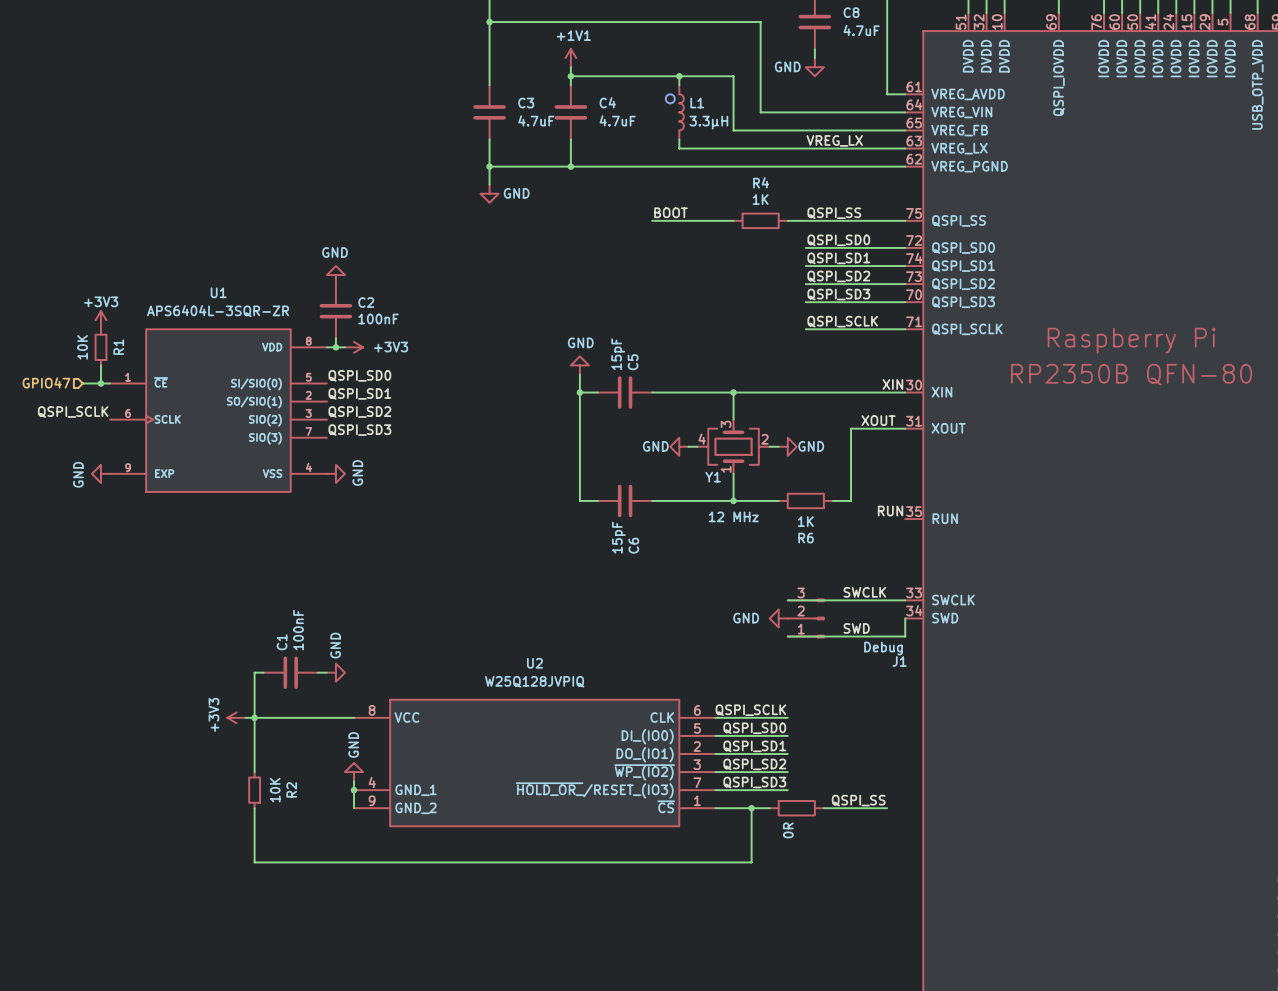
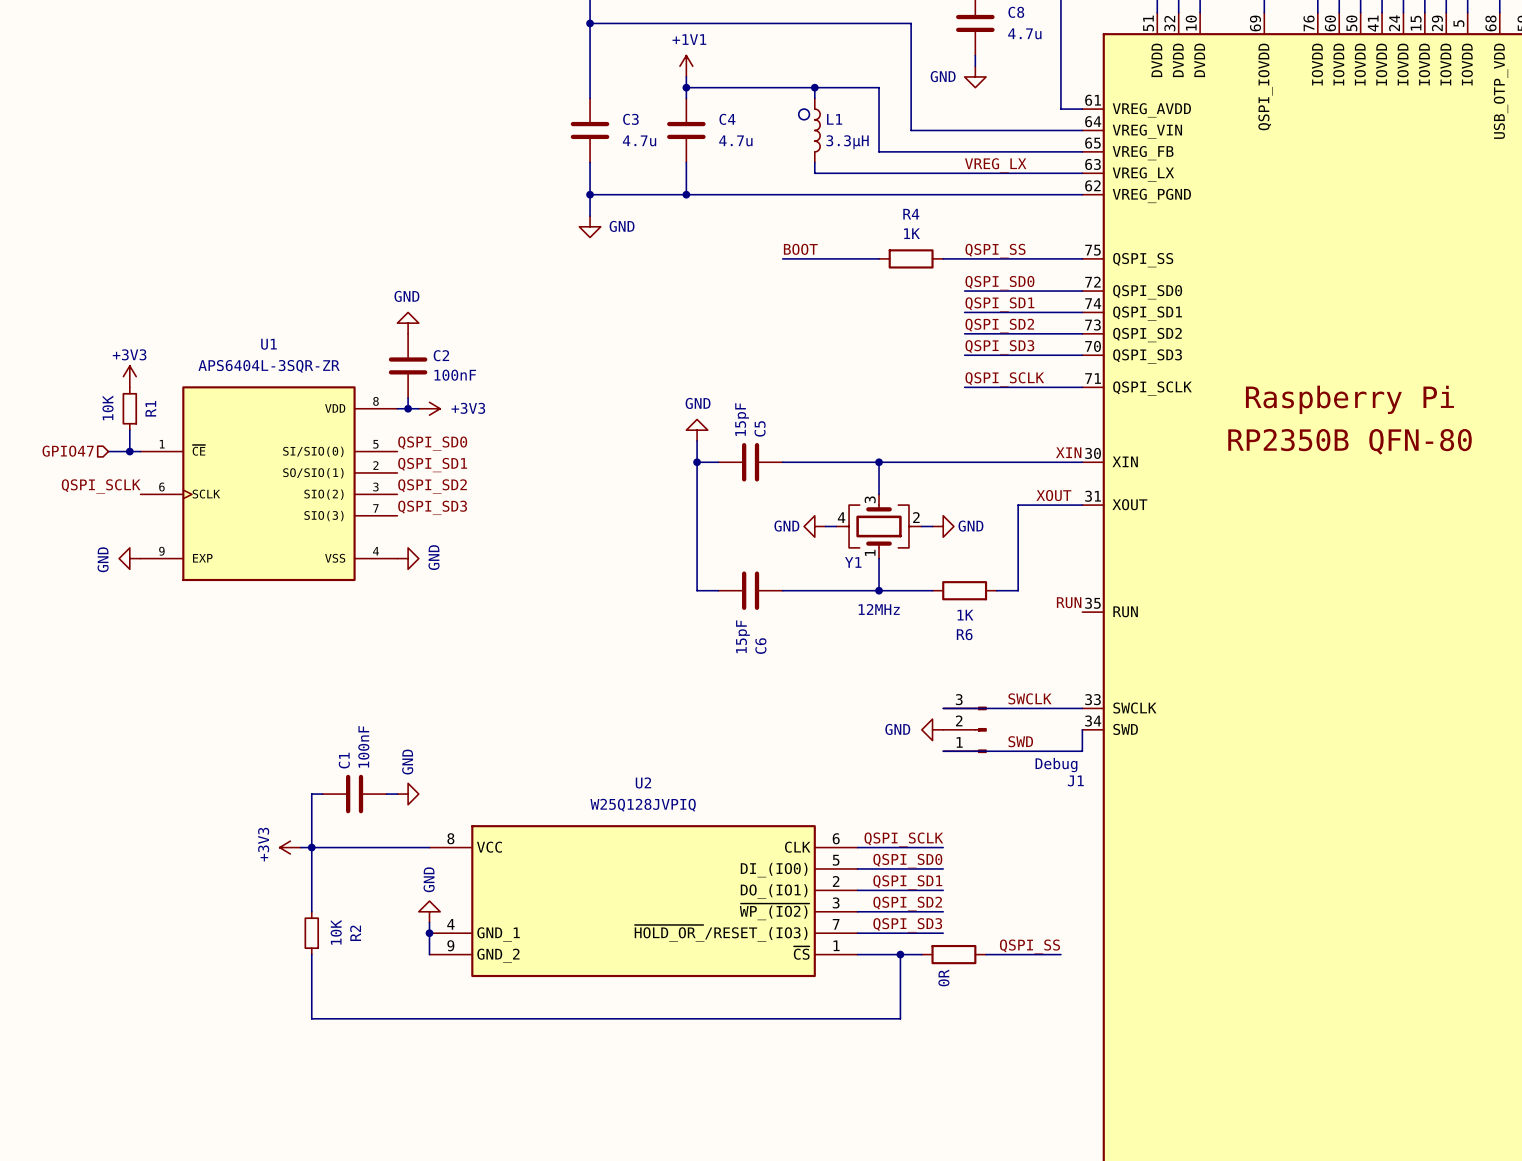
C8 value: 4.7uF (861, 30) -> 4.7u (1024, 33)
C3 value: 4.7uF (536, 120) -> 4.7u (639, 140)
C4 value: 4.7uF (617, 120) -> 4.7u (735, 140)
Y1 value: 12 MHz (733, 516) -> 12MHz (879, 609)

